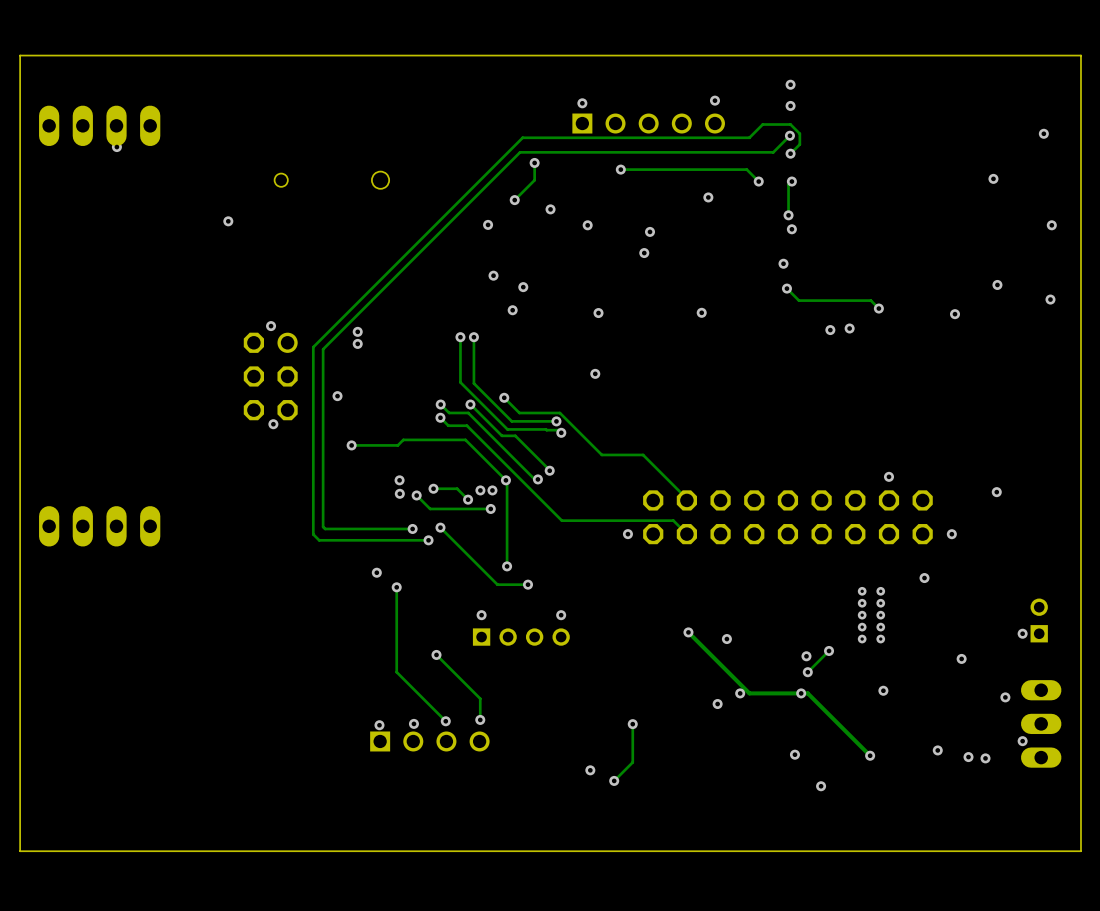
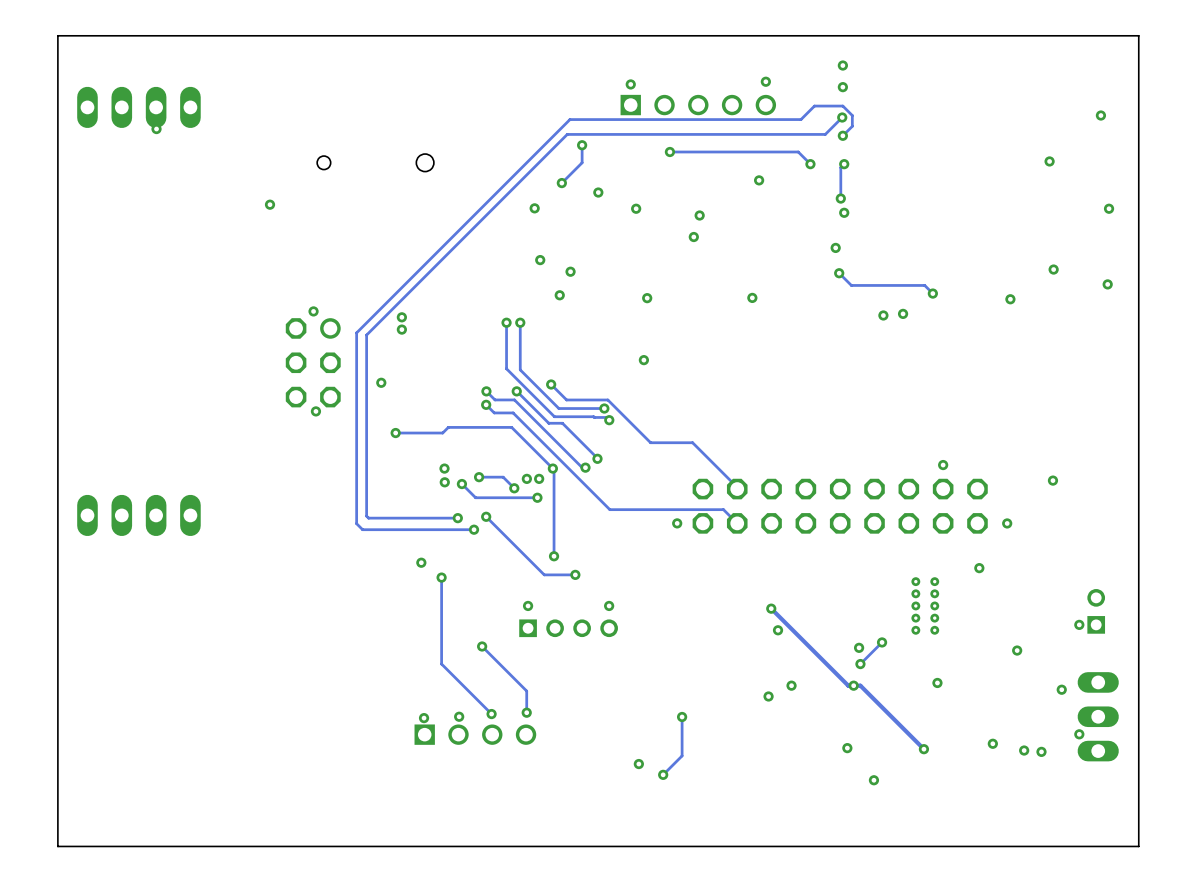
track: (688, 632) (749, 693) (795, 693) -> (771, 608) (848, 685)
via position: (688, 632) -> (771, 608)

